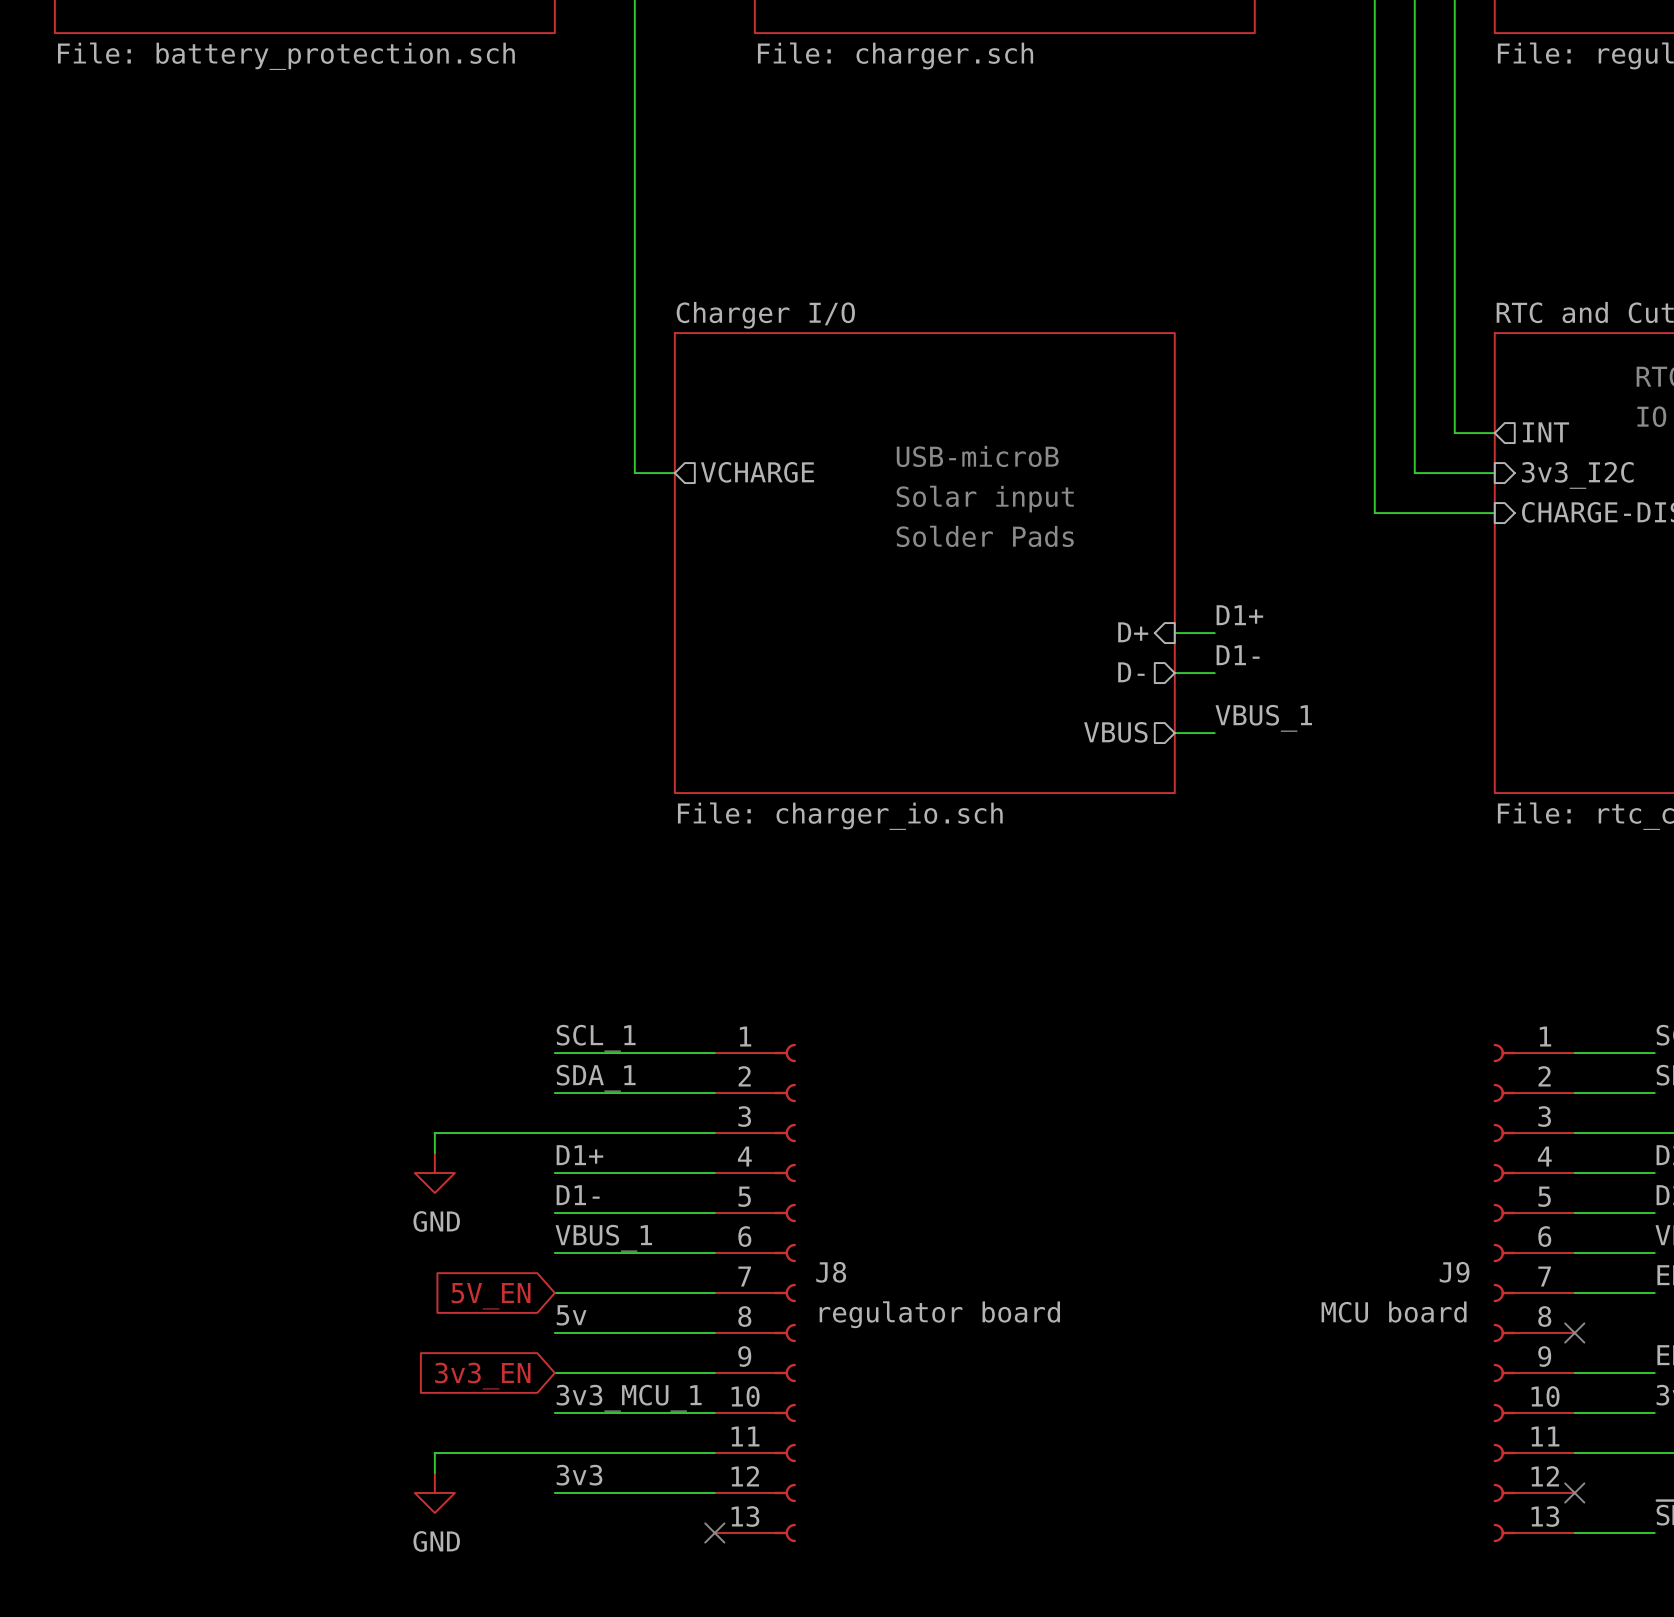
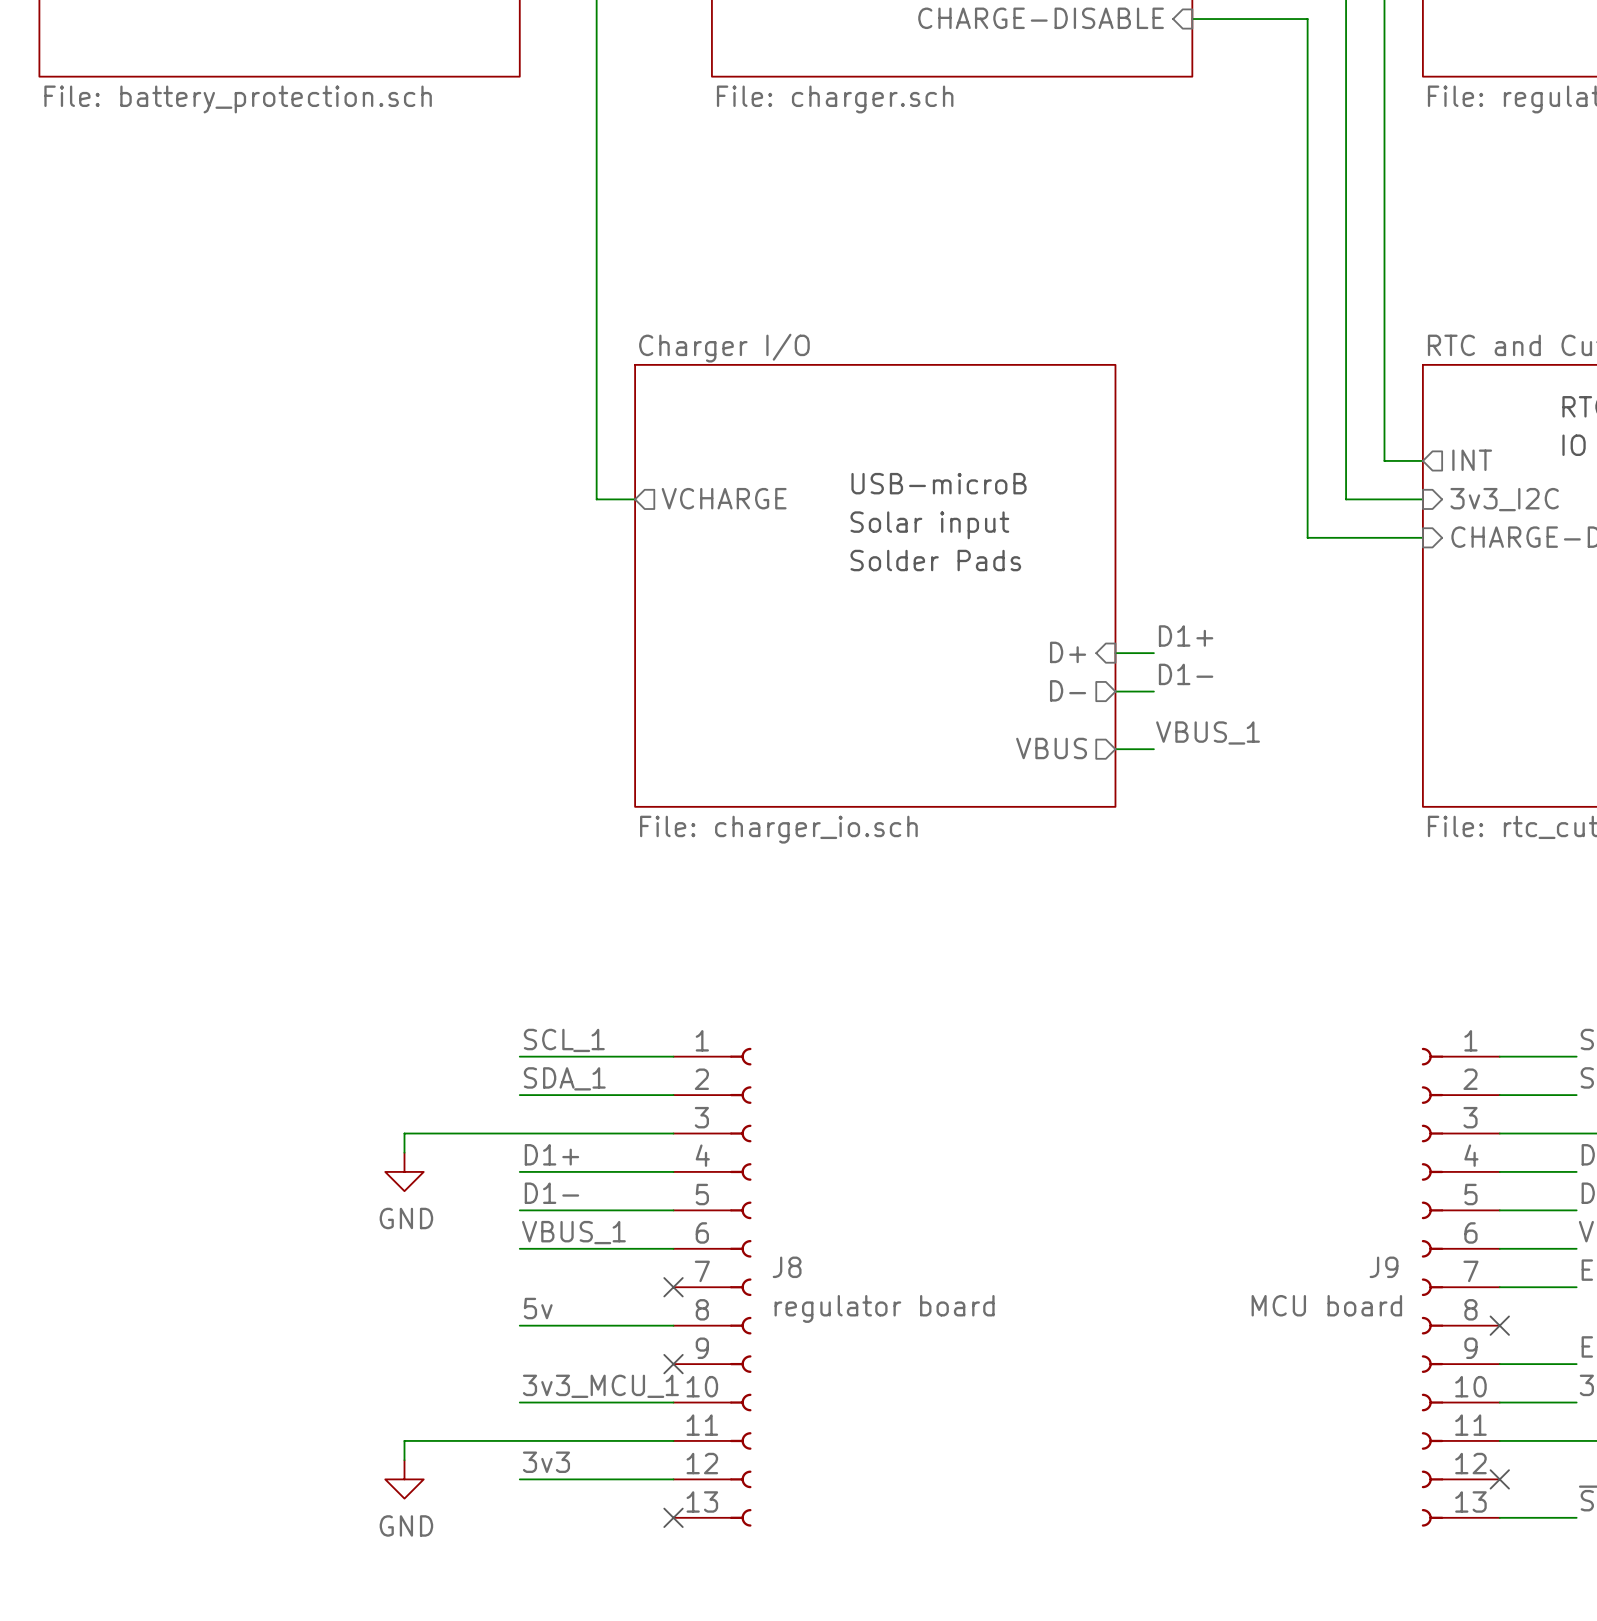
wire: (554, 1293) (714, 1293) -> none
no-connect mark: none -> (673, 1287)
global label: 5V_EN (491, 1296) -> none
wire: (554, 1373) (714, 1373) -> none
no-connect mark: none -> (673, 1364)
global label: 3v3_EN (482, 1376) -> none

